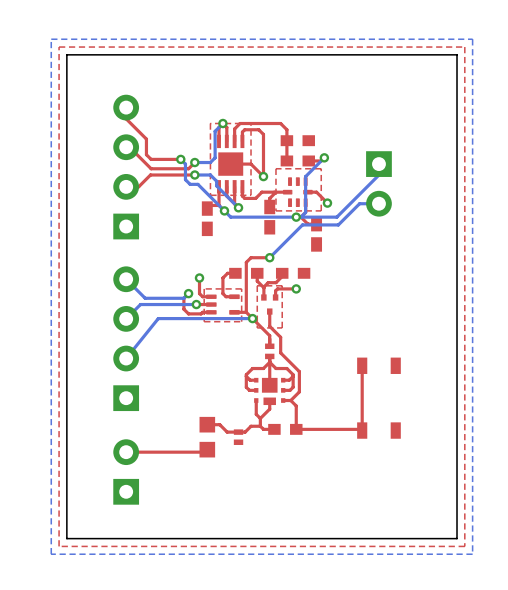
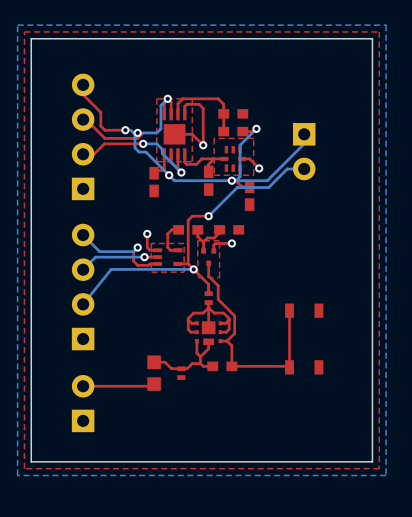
via: none -> (125, 130)
via: (180, 159) -> none
via: none -> (137, 132)
via: (194, 162) -> none

